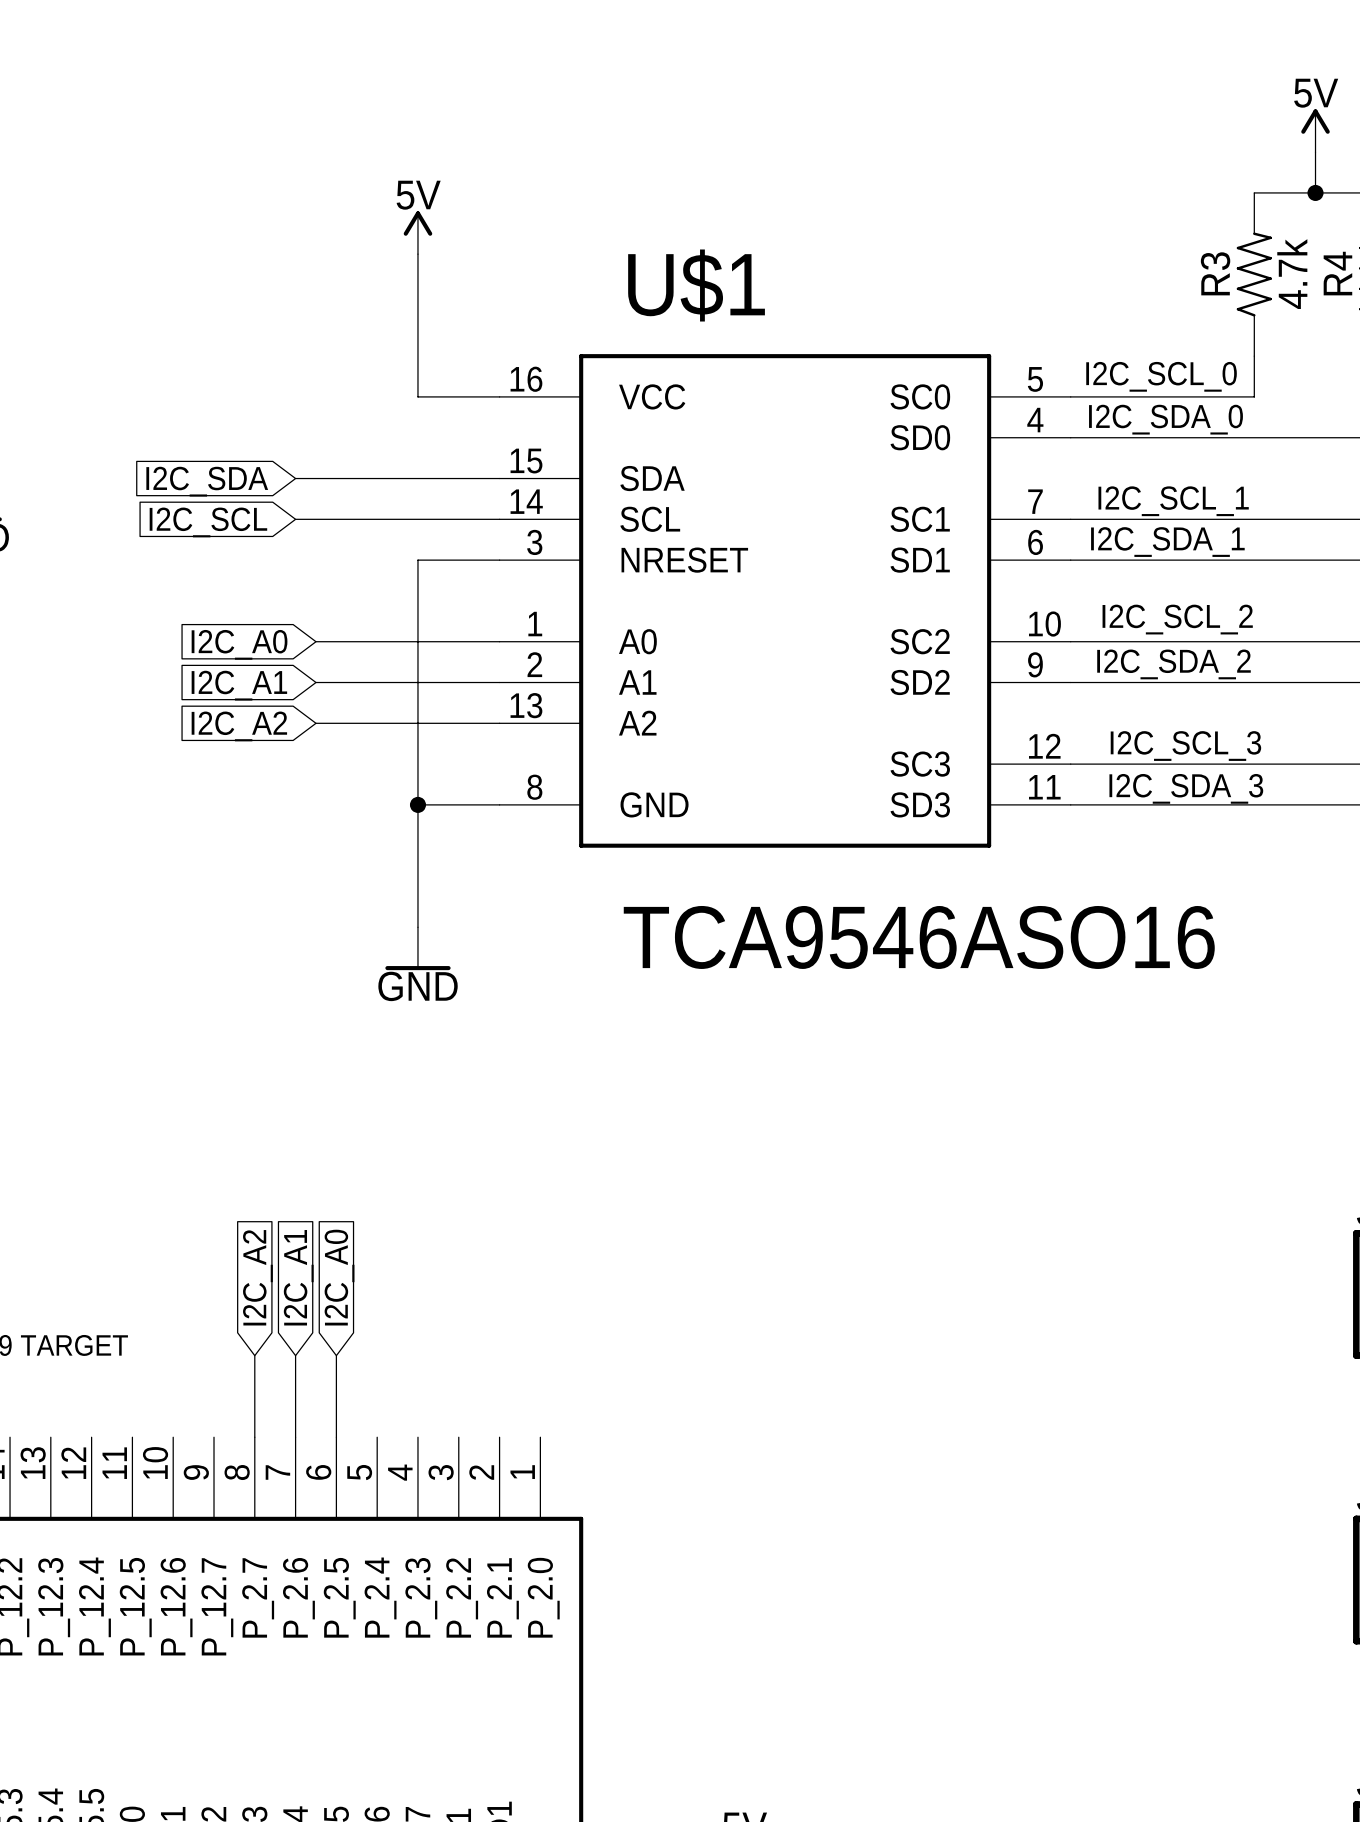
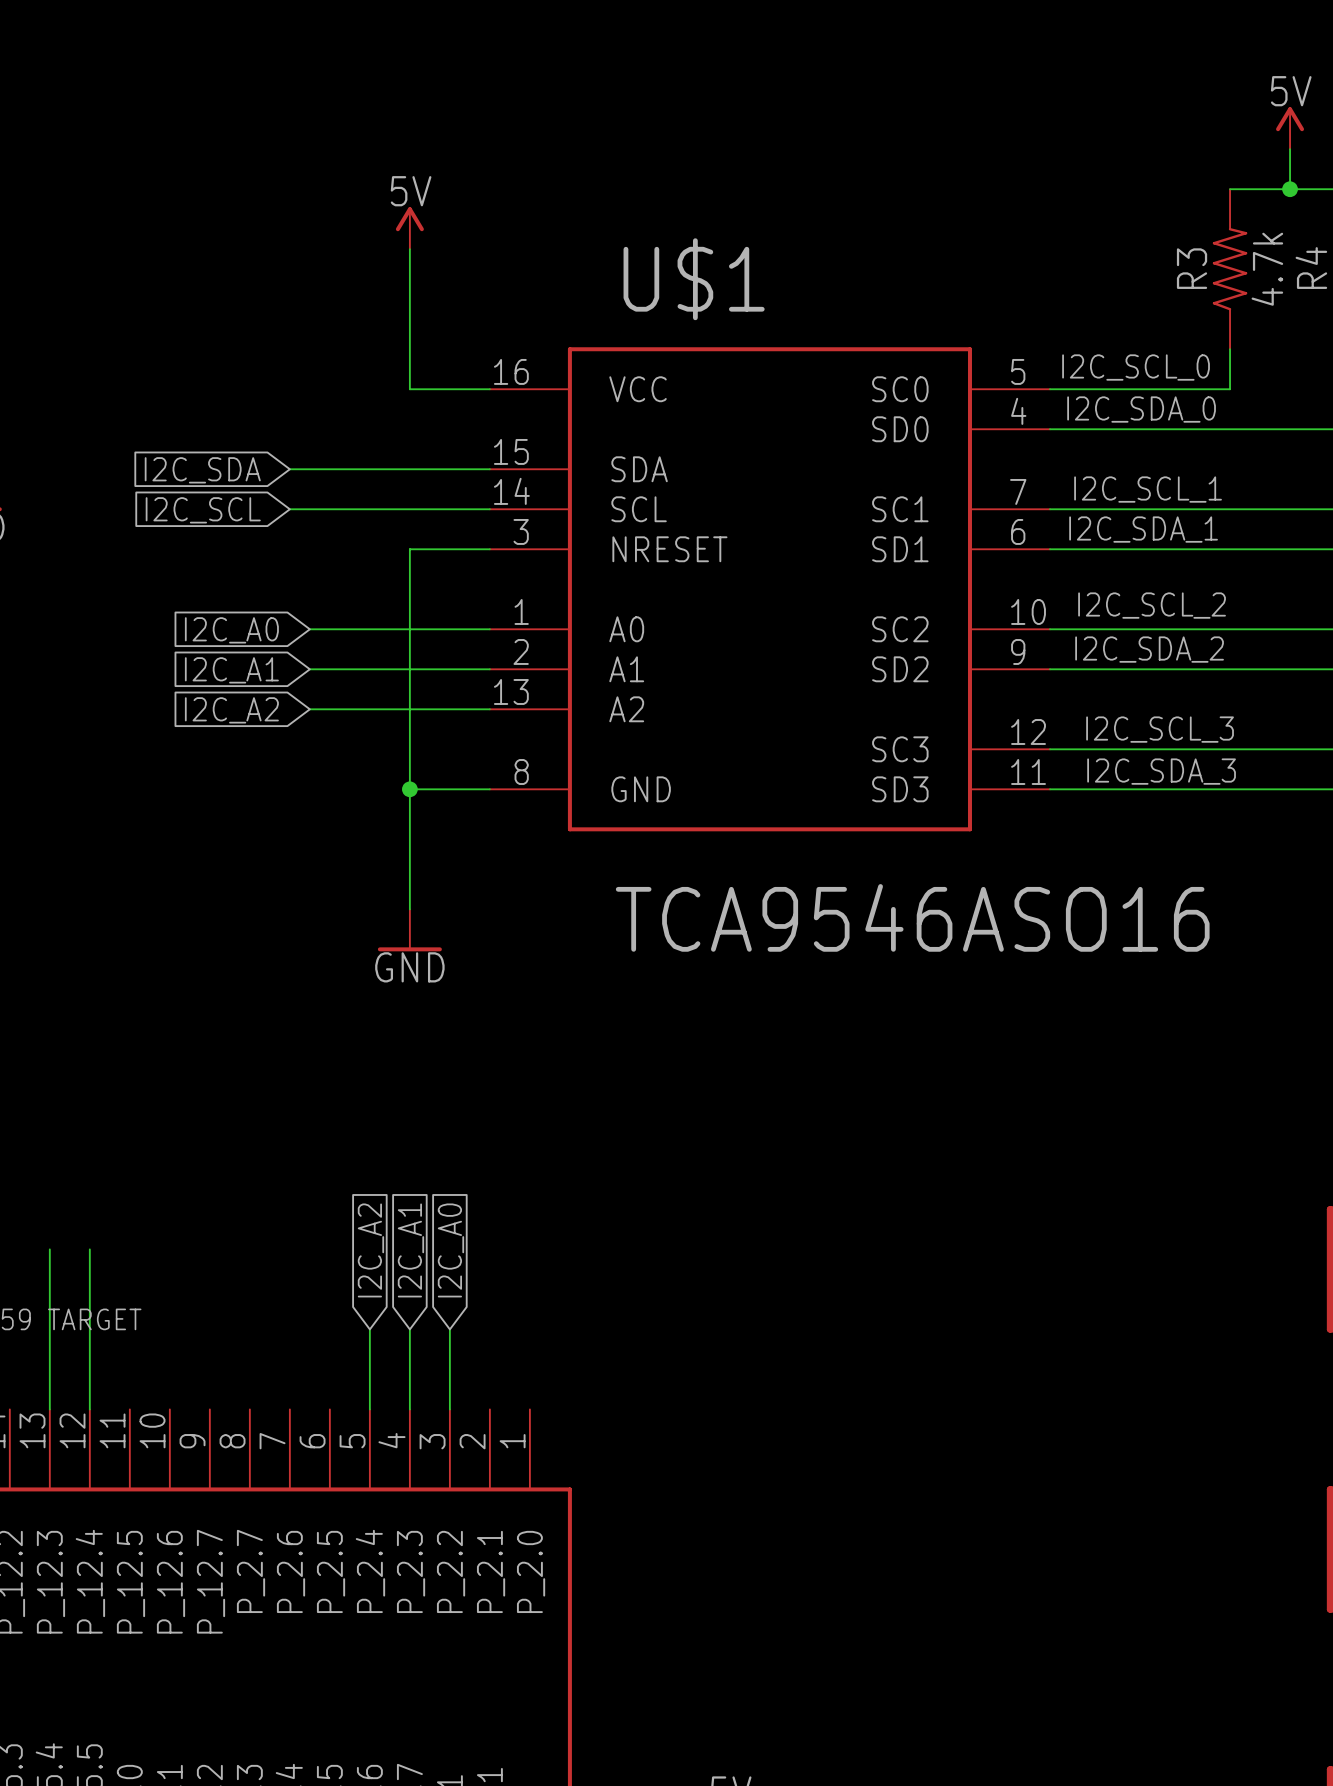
wire: none -> (49, 1249) (49, 1409)
wire: none -> (89, 1249) (89, 1409)
global label position: I2C_A2 (257, 1277) -> I2C_A2 (370, 1250)
global label position: I2C_A1 (298, 1277) -> I2C_A1 (410, 1250)
global label position: I2C_A0 (339, 1277) -> I2C_A0 (450, 1250)
wire: (254, 1355) (254, 1437) -> (369, 1329) (369, 1409)
wire: (295, 1355) (295, 1437) -> (409, 1329) (409, 1409)
wire: (336, 1355) (336, 1437) -> (449, 1329) (449, 1409)

